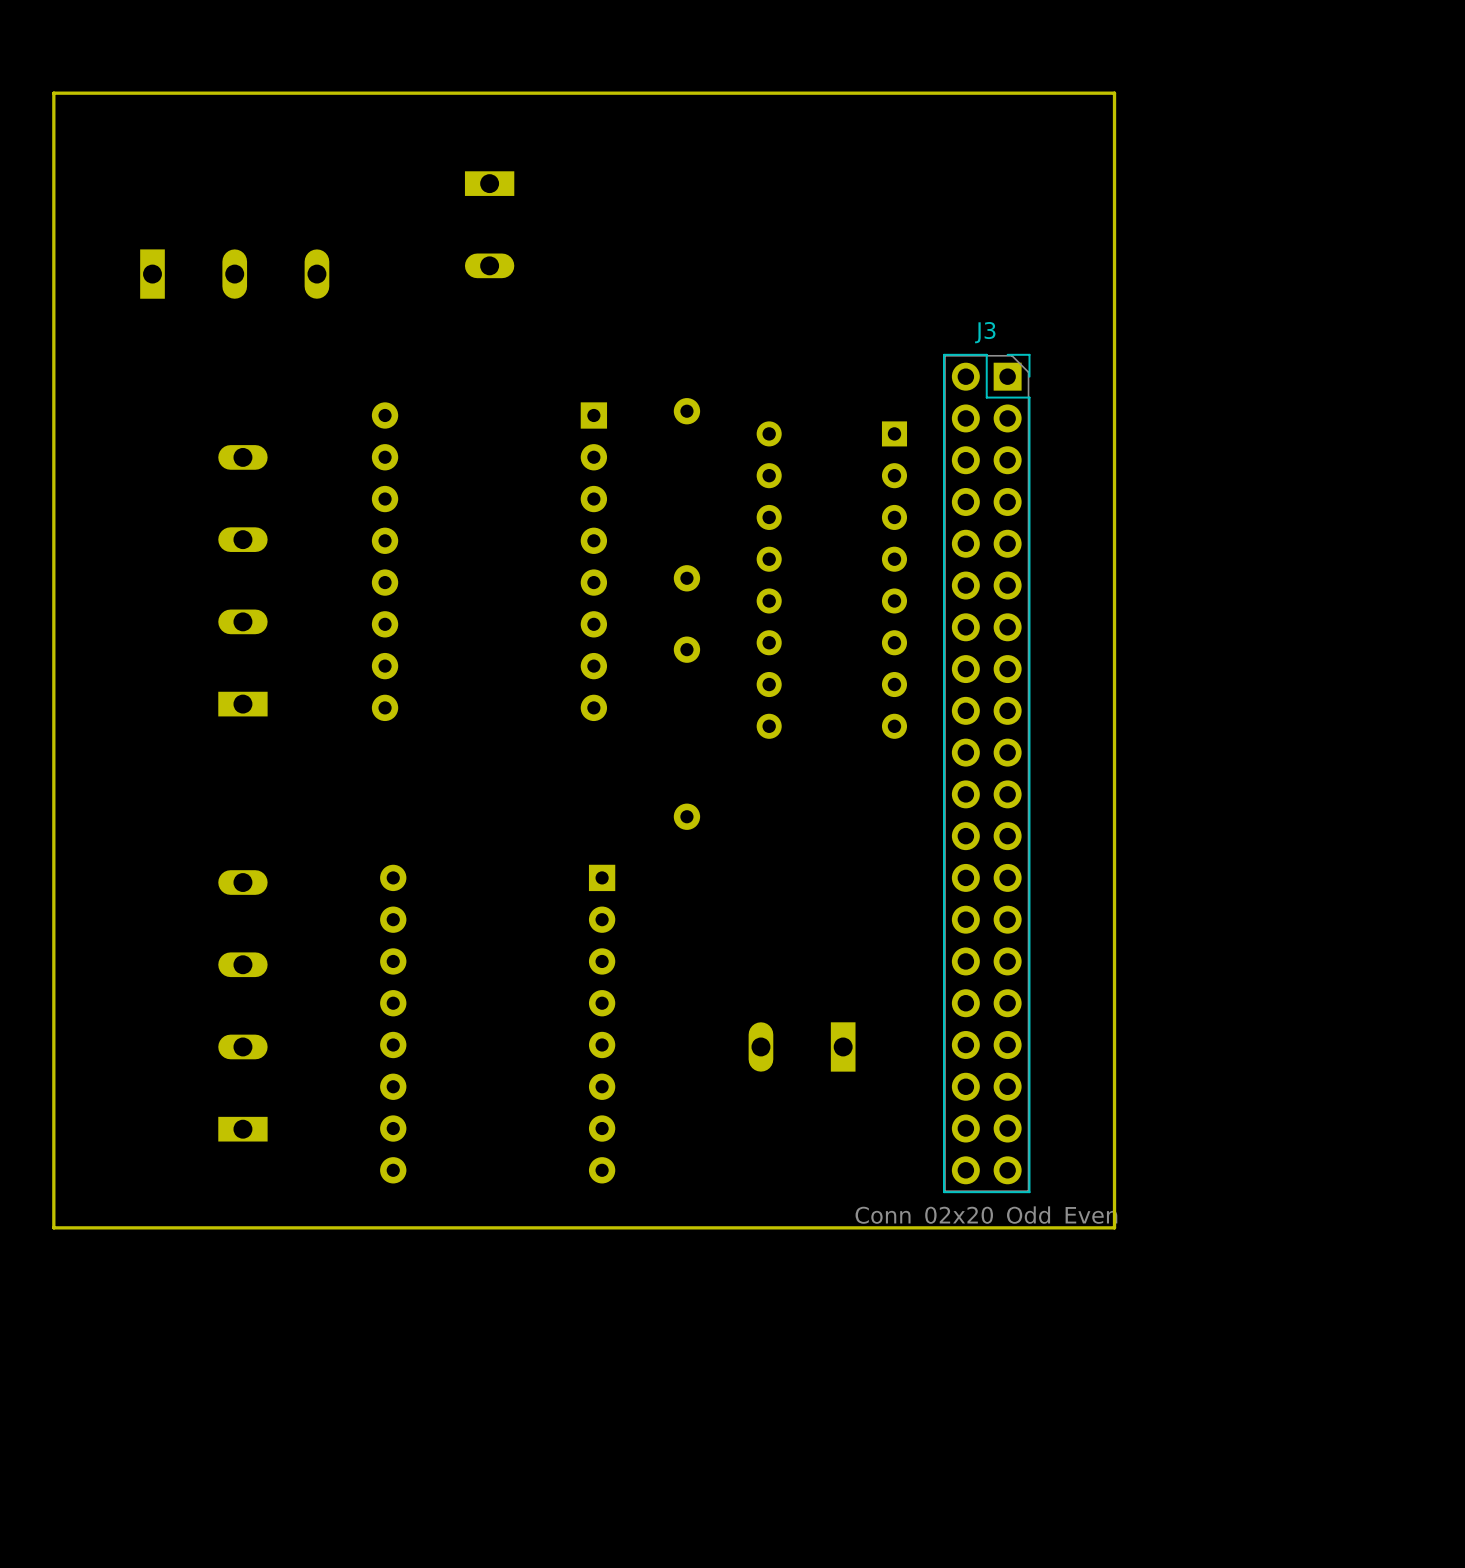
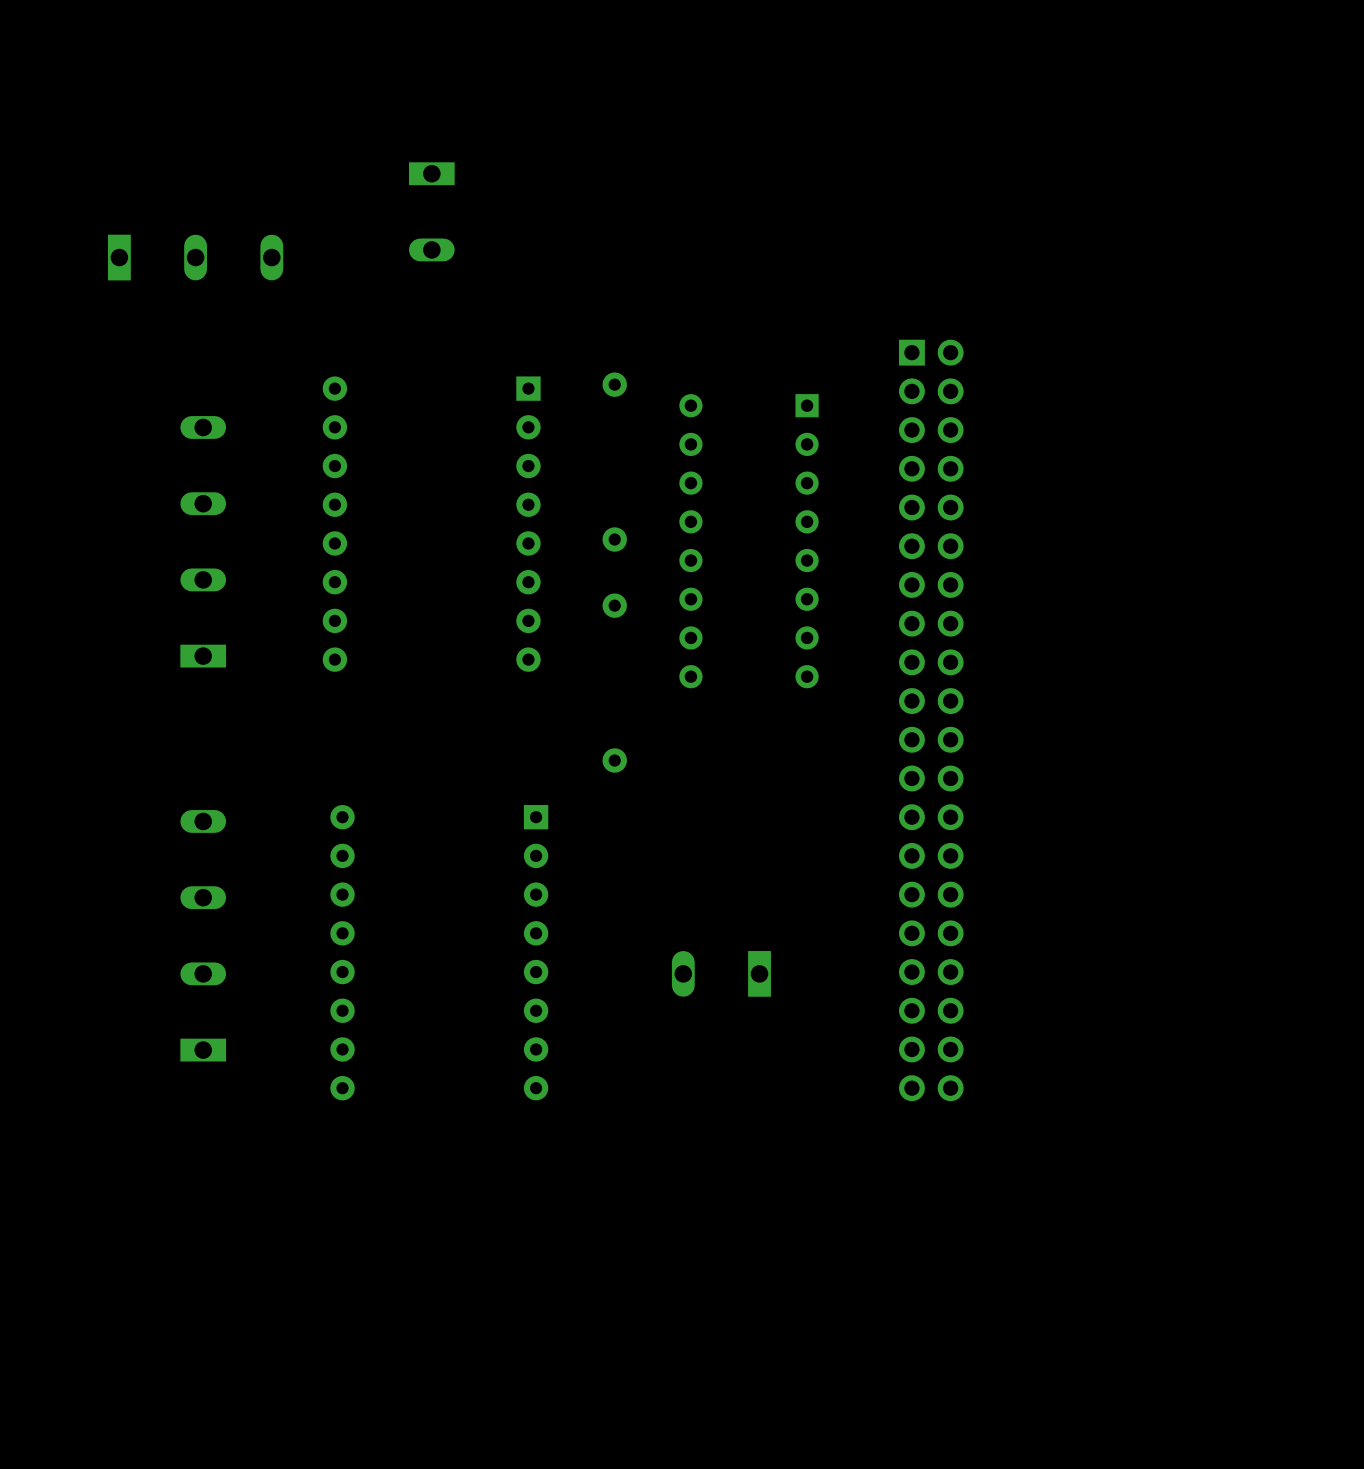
board edge: (1114, 93) (53, 93) (53, 1227) (1114, 1227) (1114, 93) -> none
J3 side: bottom (986, 773) -> top (931, 720)

